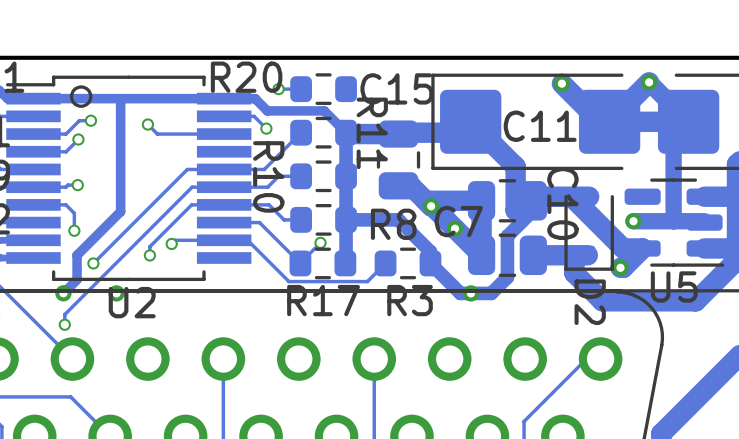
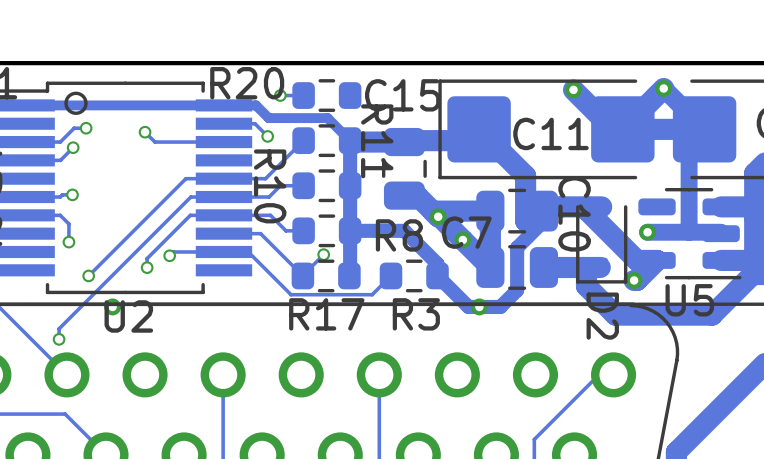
track: (120, 98) (120, 211) (77, 255) (77, 279) (63, 293) -> none
via: (63, 293) -> none

